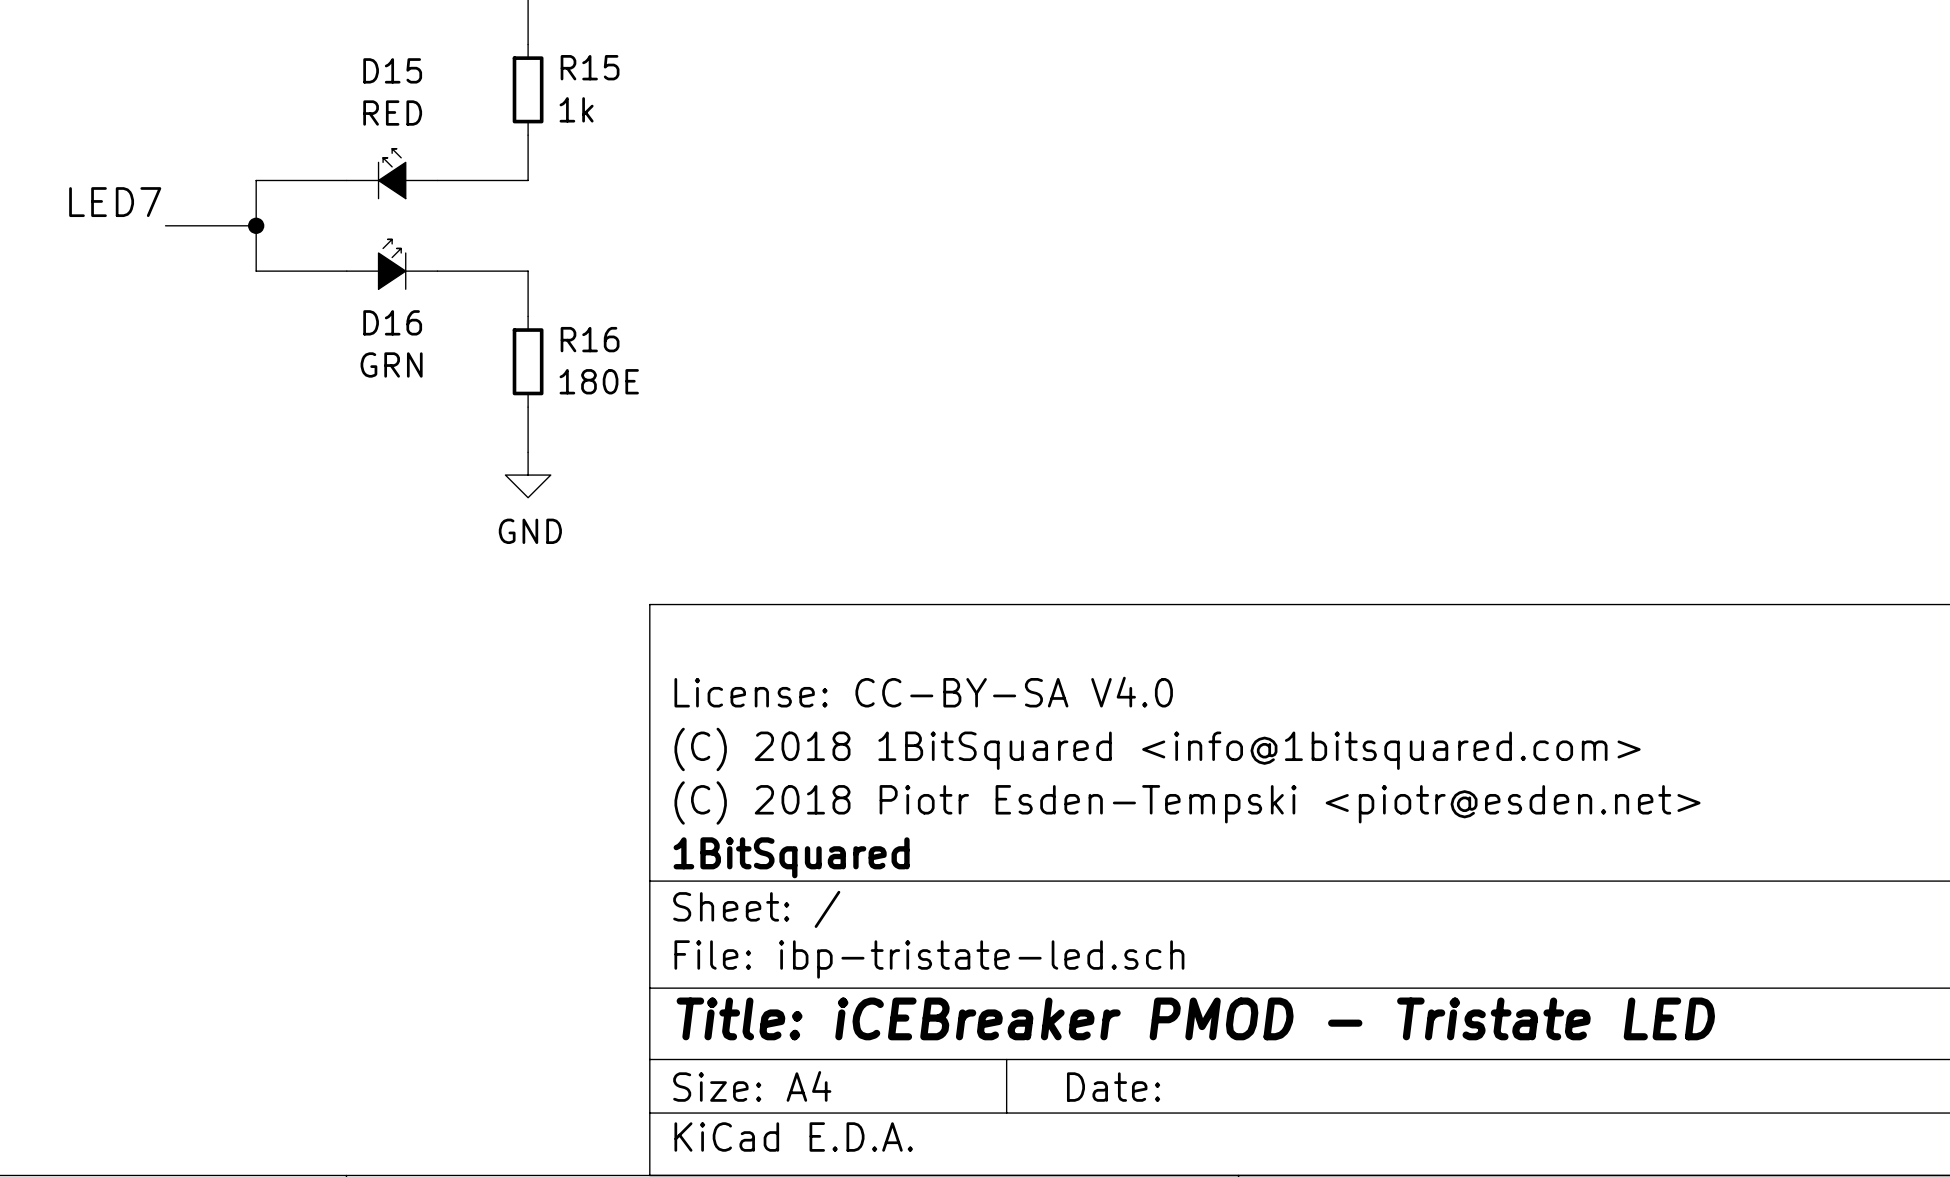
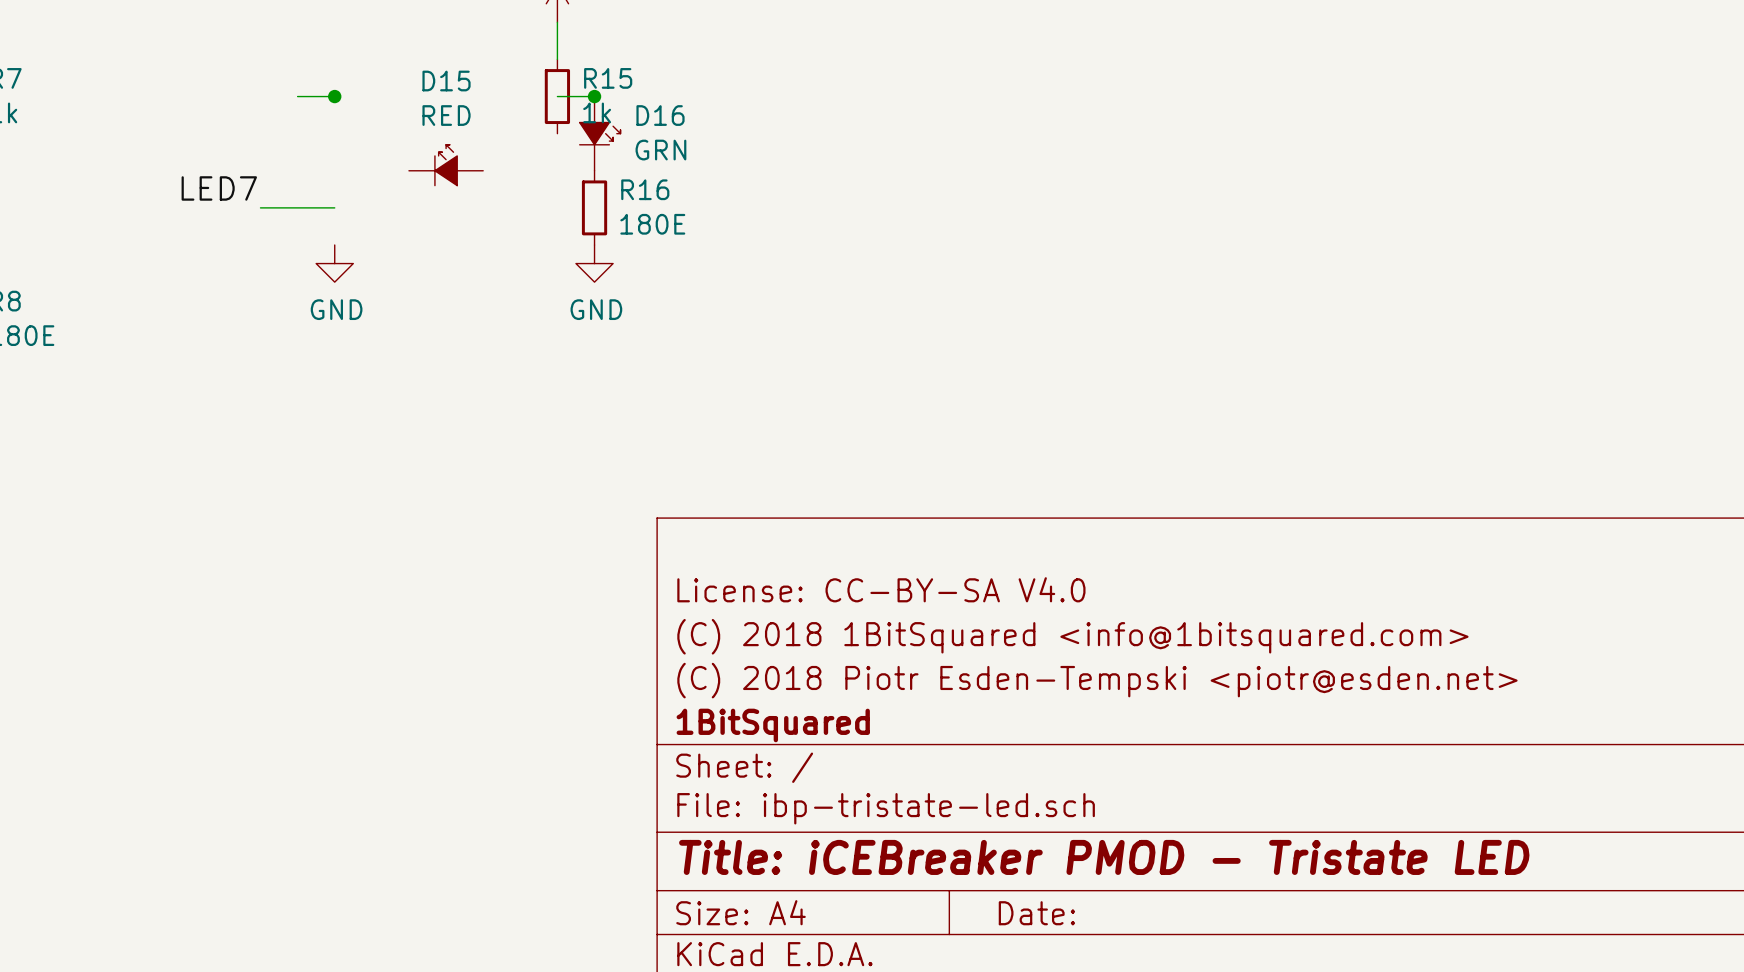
wire: none -> (297, 96) (334, 96)
junction: none -> (334, 96)
wire: none -> (557, 96) (594, 96)
junction: none -> (594, 96)
wire: (528, 135) (528, 180) (437, 180) -> none
wire: (346, 180) (256, 180) (256, 271) (346, 271) -> none
junction: (256, 225) -> none
D16 rotation: 0° (392, 264) -> 90° clockwise (600, 133)
D16 position: (392, 264) -> (600, 133)
wire: (437, 271) (528, 271) (528, 316) -> none
power symbol: none -> GND (334, 263)
power symbol: none -> GND (594, 263)
D16 name position: D16 (392, 322) -> D16 (660, 115)
R16 position: (528, 361) -> (594, 207)
D16 value position: GRN (391, 364) -> GRN (660, 150)
wire: (528, 407) (528, 452) -> none
power symbol: GND (528, 475) -> none

